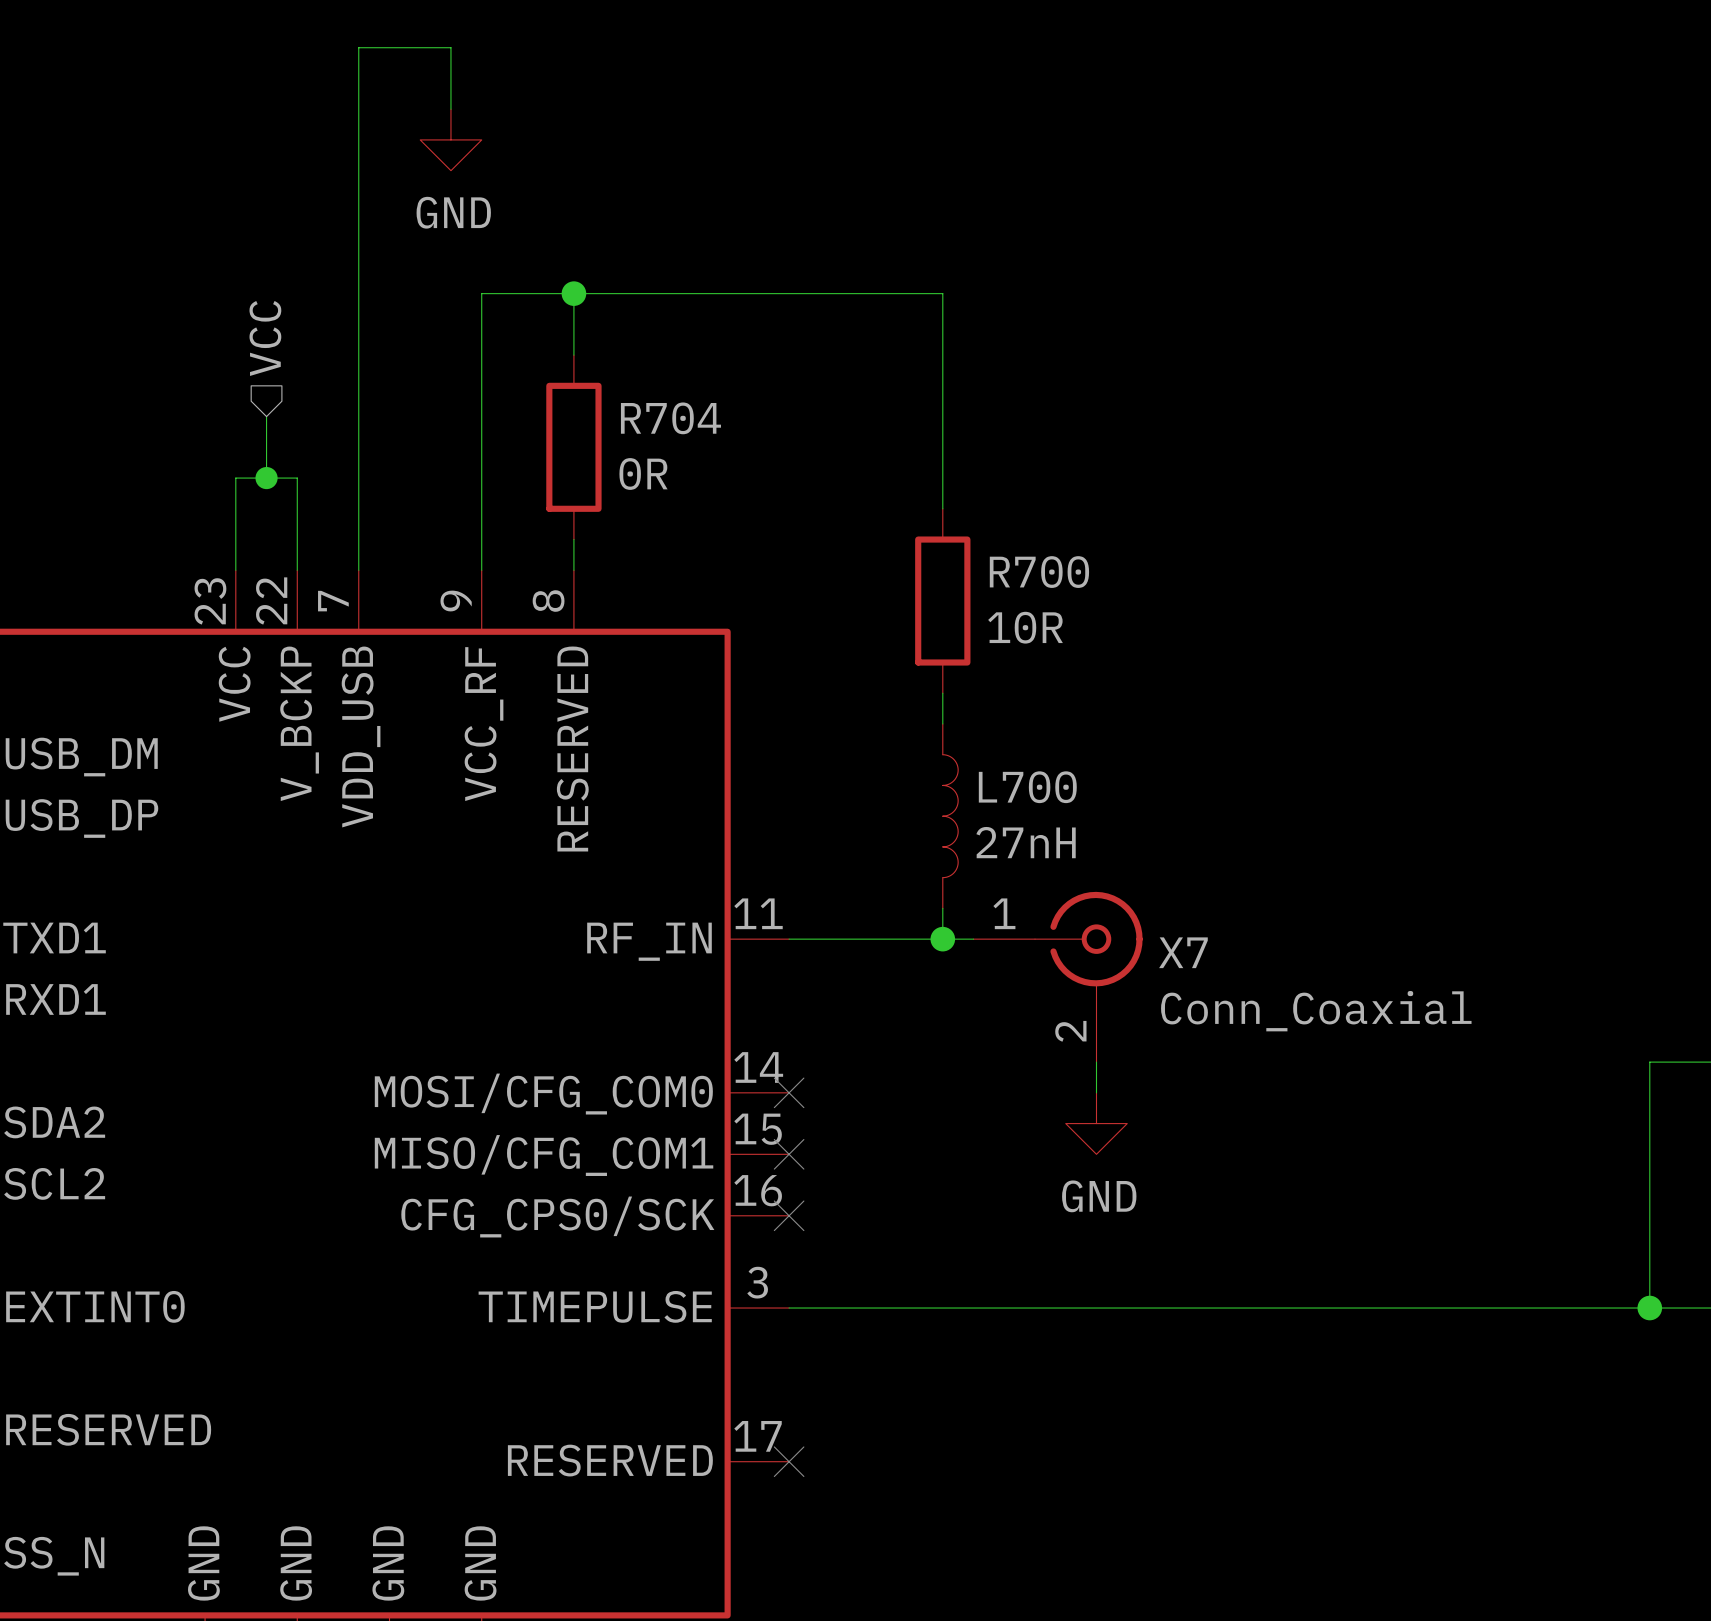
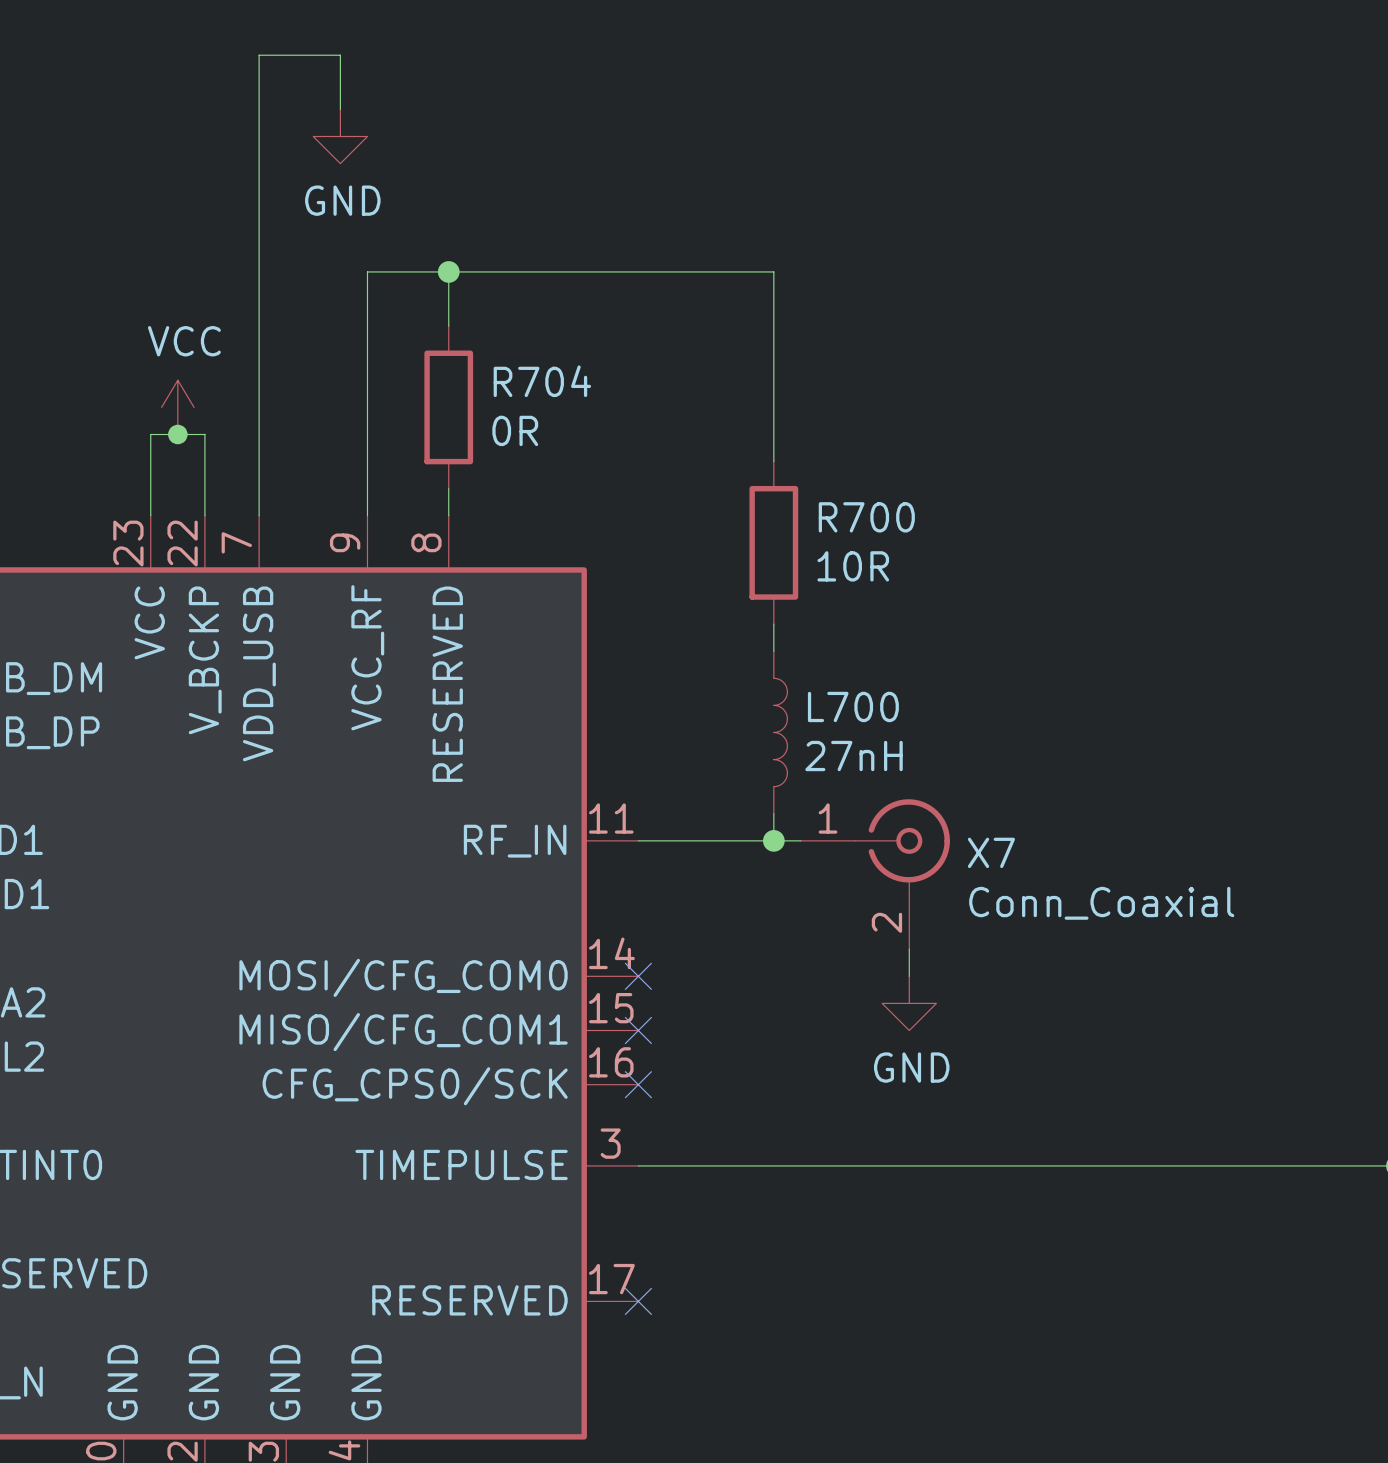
hierarchical label: VCC (265, 338) -> none
power symbol: none -> VCC (177, 407)

